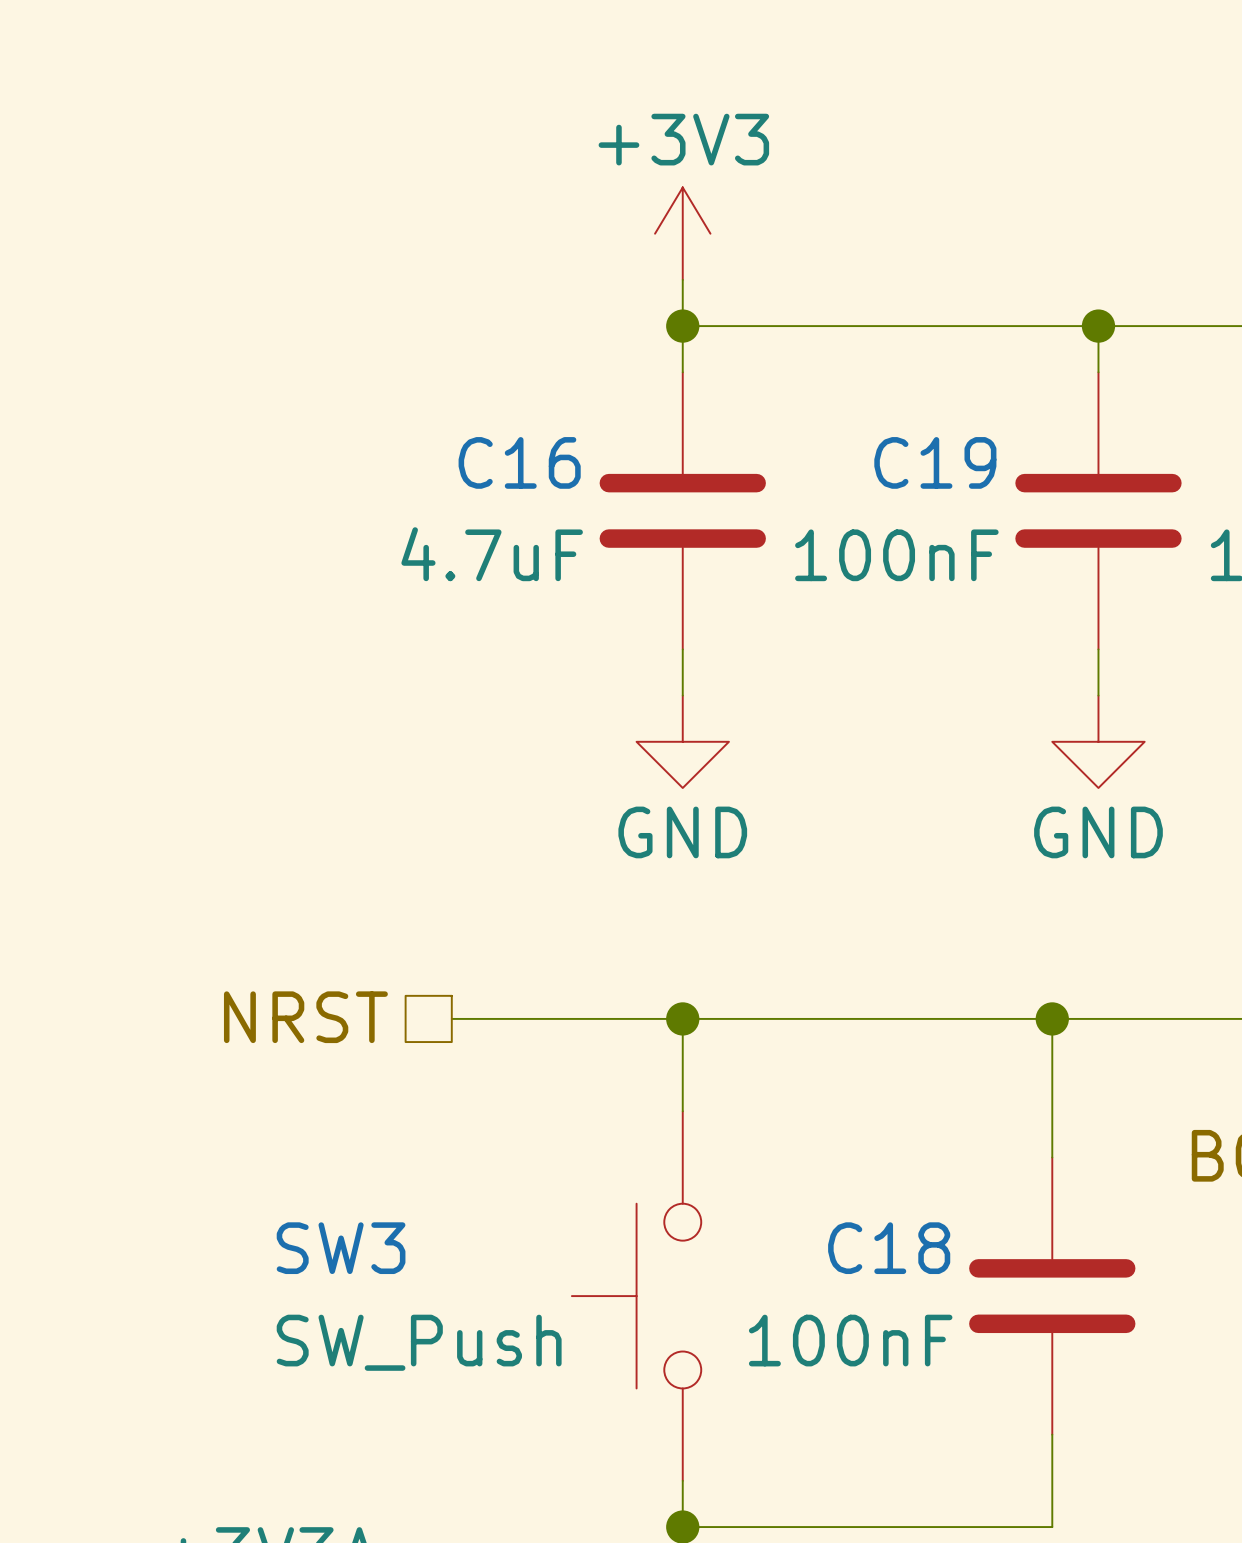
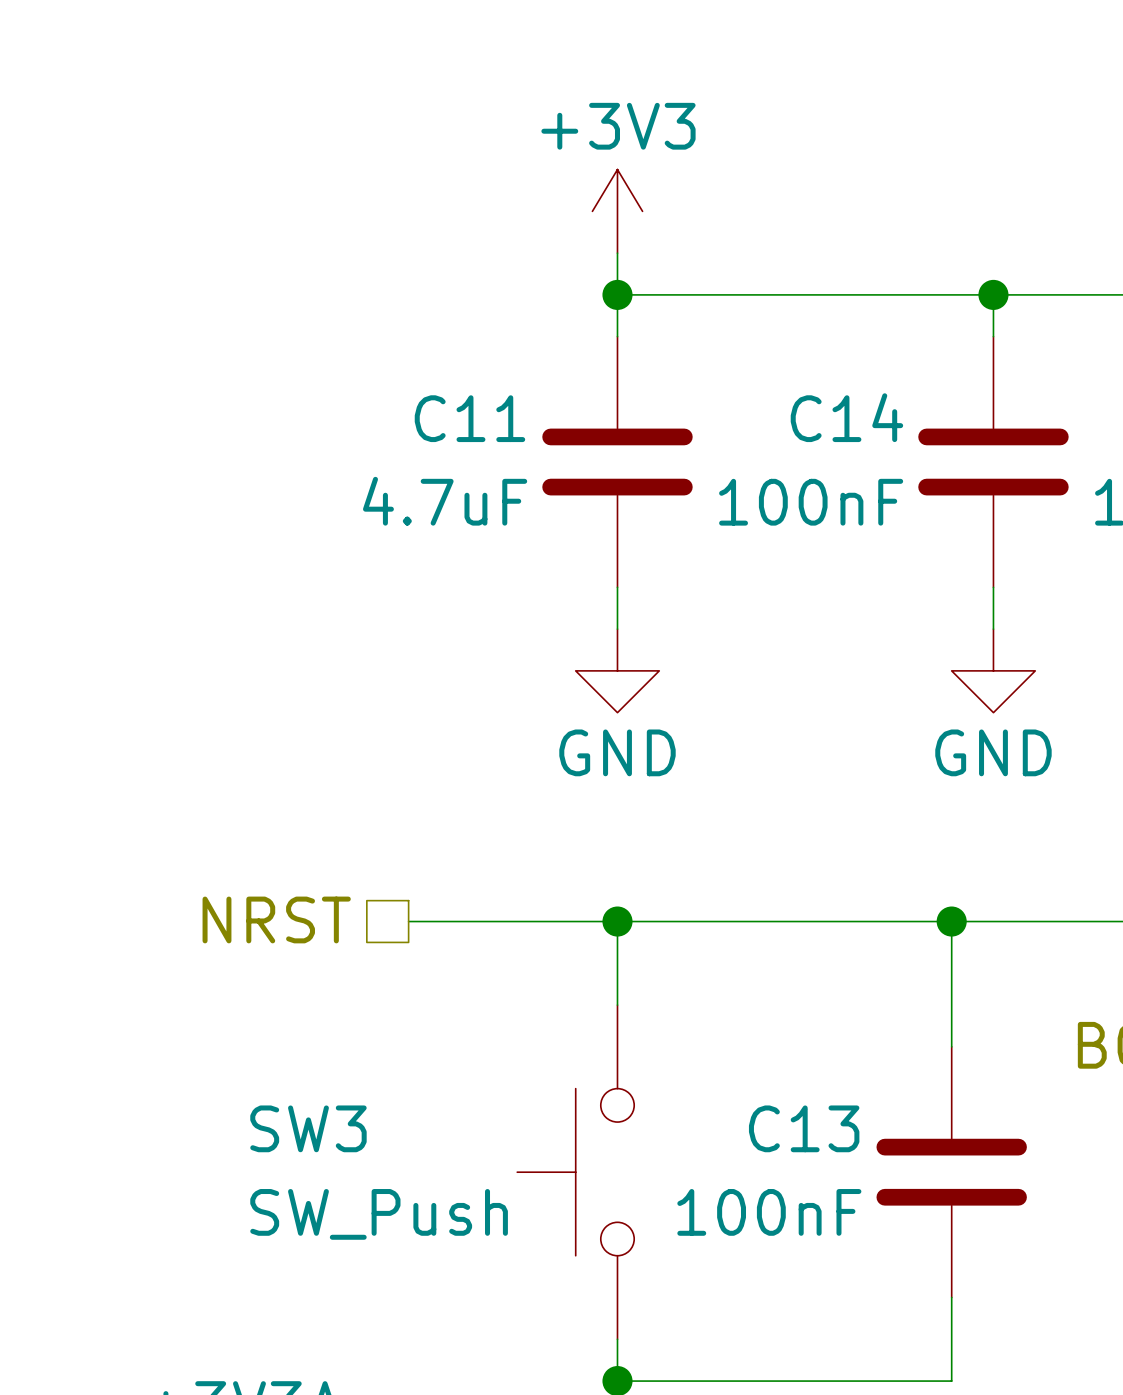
C16 name: C16 (519, 462) -> C11 (469, 418)
C19 name: C19 (935, 462) -> C14 (846, 417)
C18 name: C18 (889, 1248) -> C13 (804, 1128)

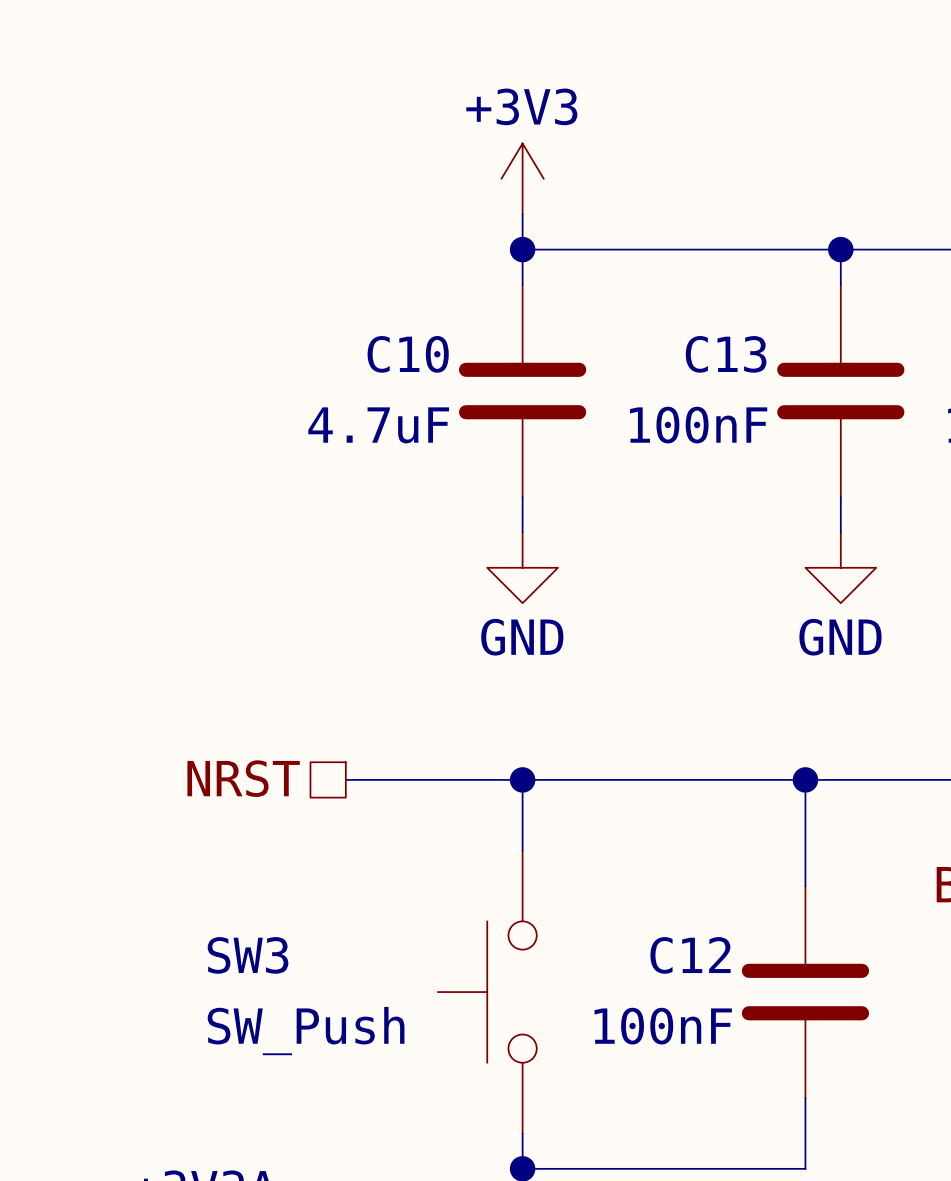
C14 name: C14 (846, 417) -> C13 (726, 354)
C11 name: C11 (469, 418) -> C10 (408, 354)
C13 name: C13 (804, 1128) -> C12 (690, 955)

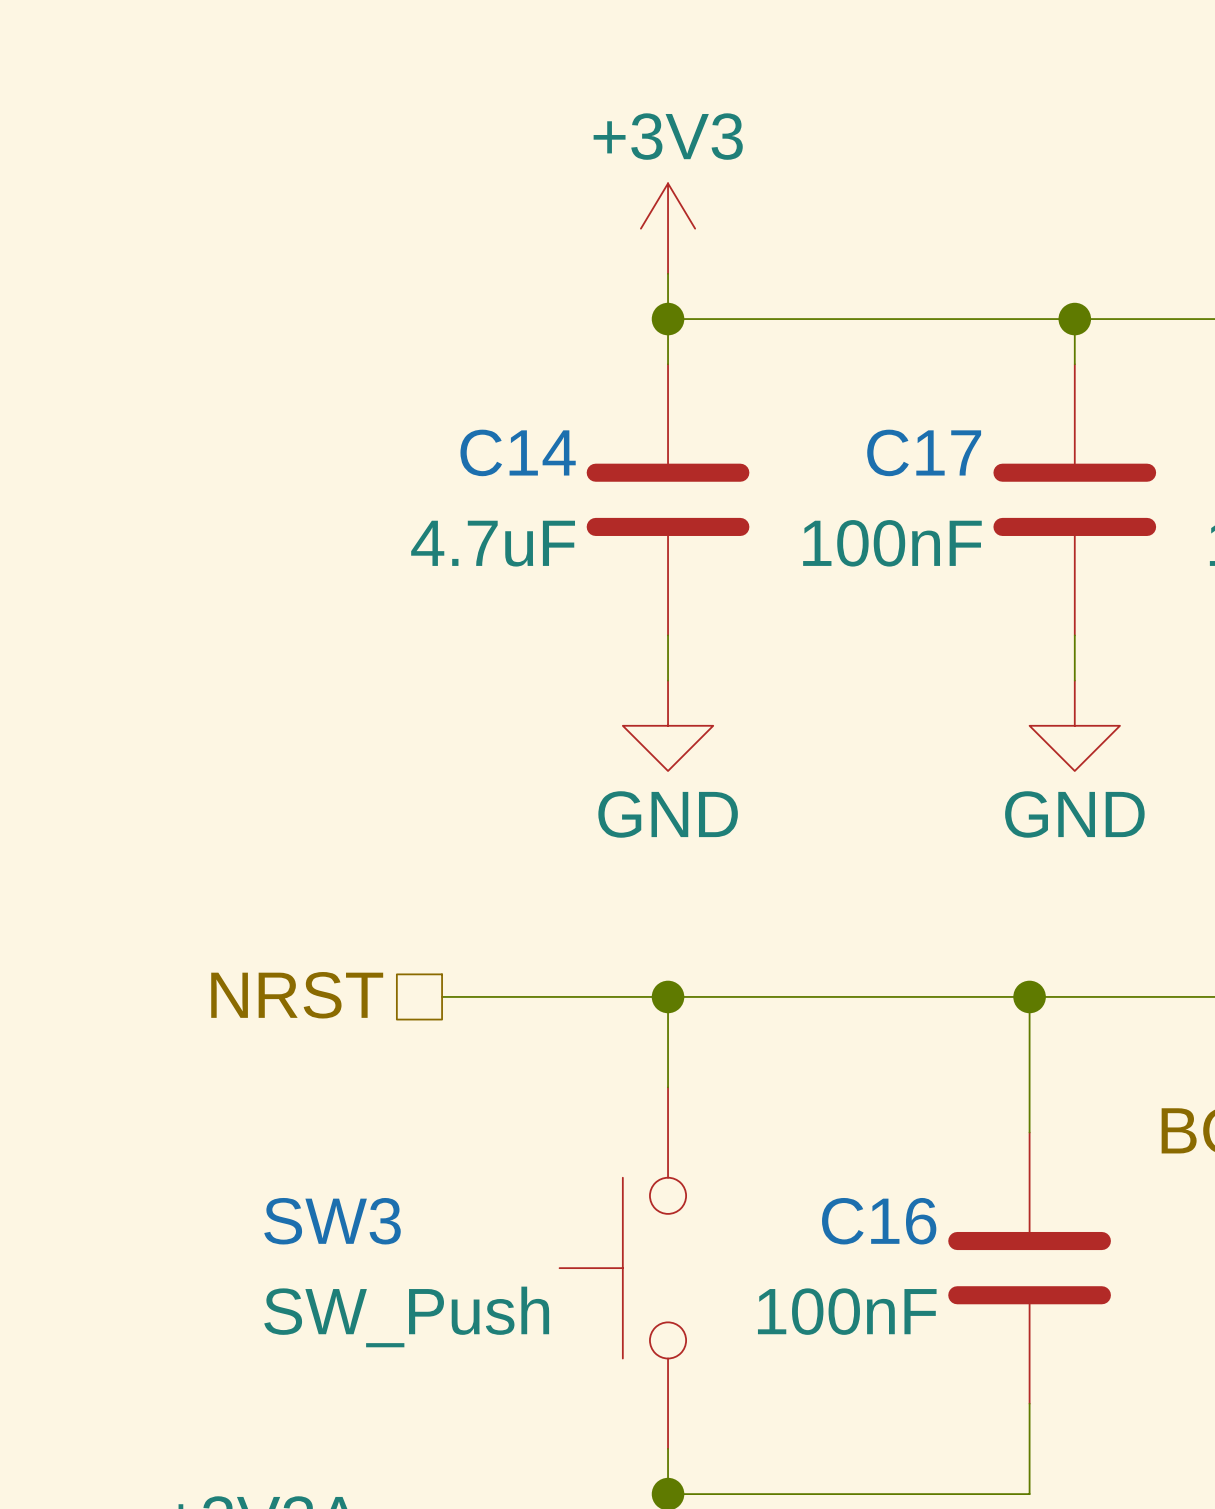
C10 name: C10 (408, 354) -> C14 (518, 452)
C13 name: C13 (726, 354) -> C17 (924, 452)
C12 name: C12 (690, 955) -> C16 (879, 1221)

